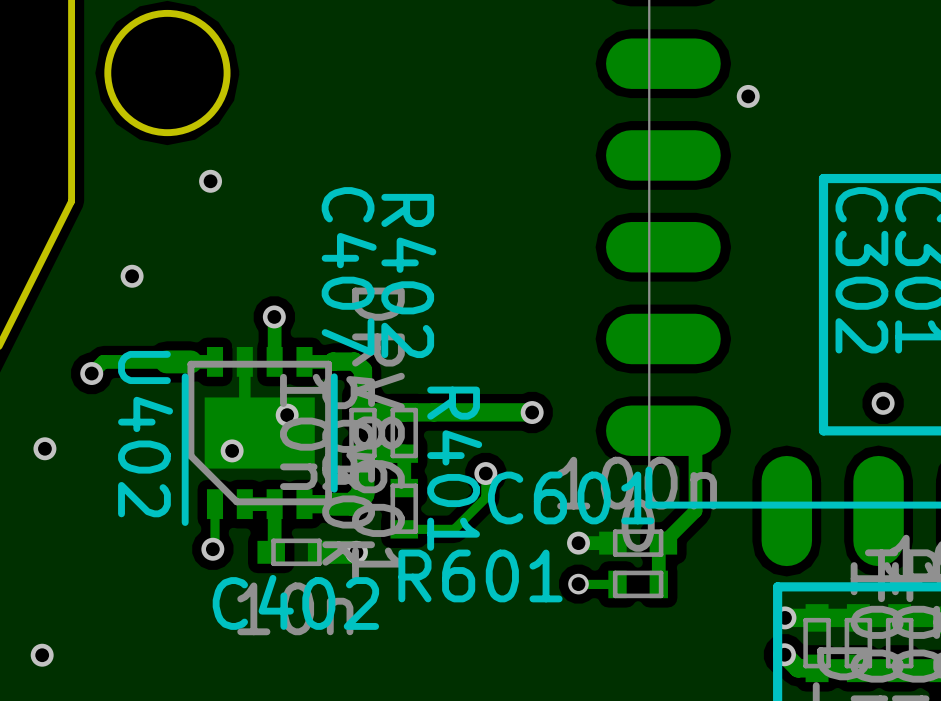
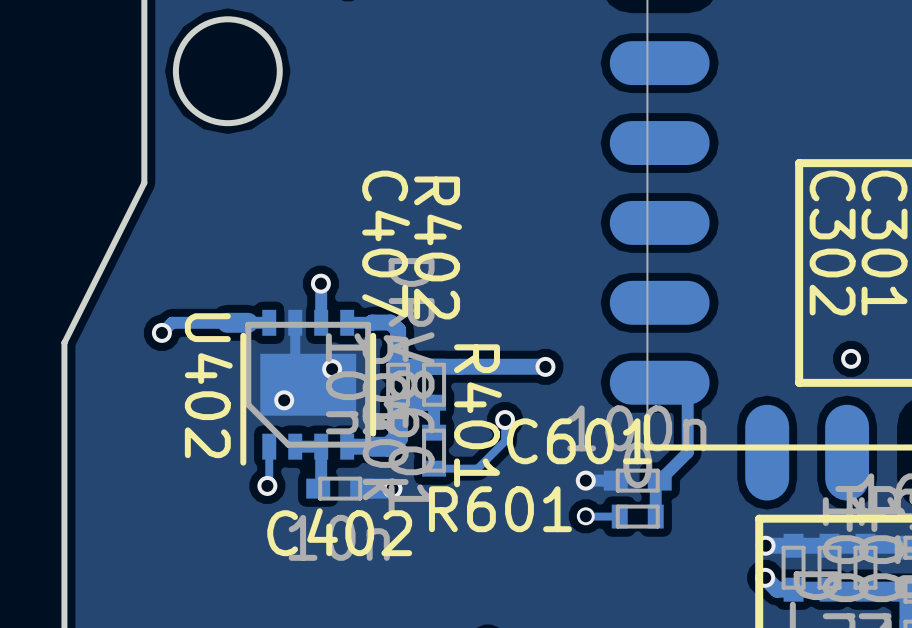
via: (748, 96) -> none
via: (210, 181) -> none
via: (132, 276) -> none
via: (44, 448) -> none
via: (42, 655) -> none

